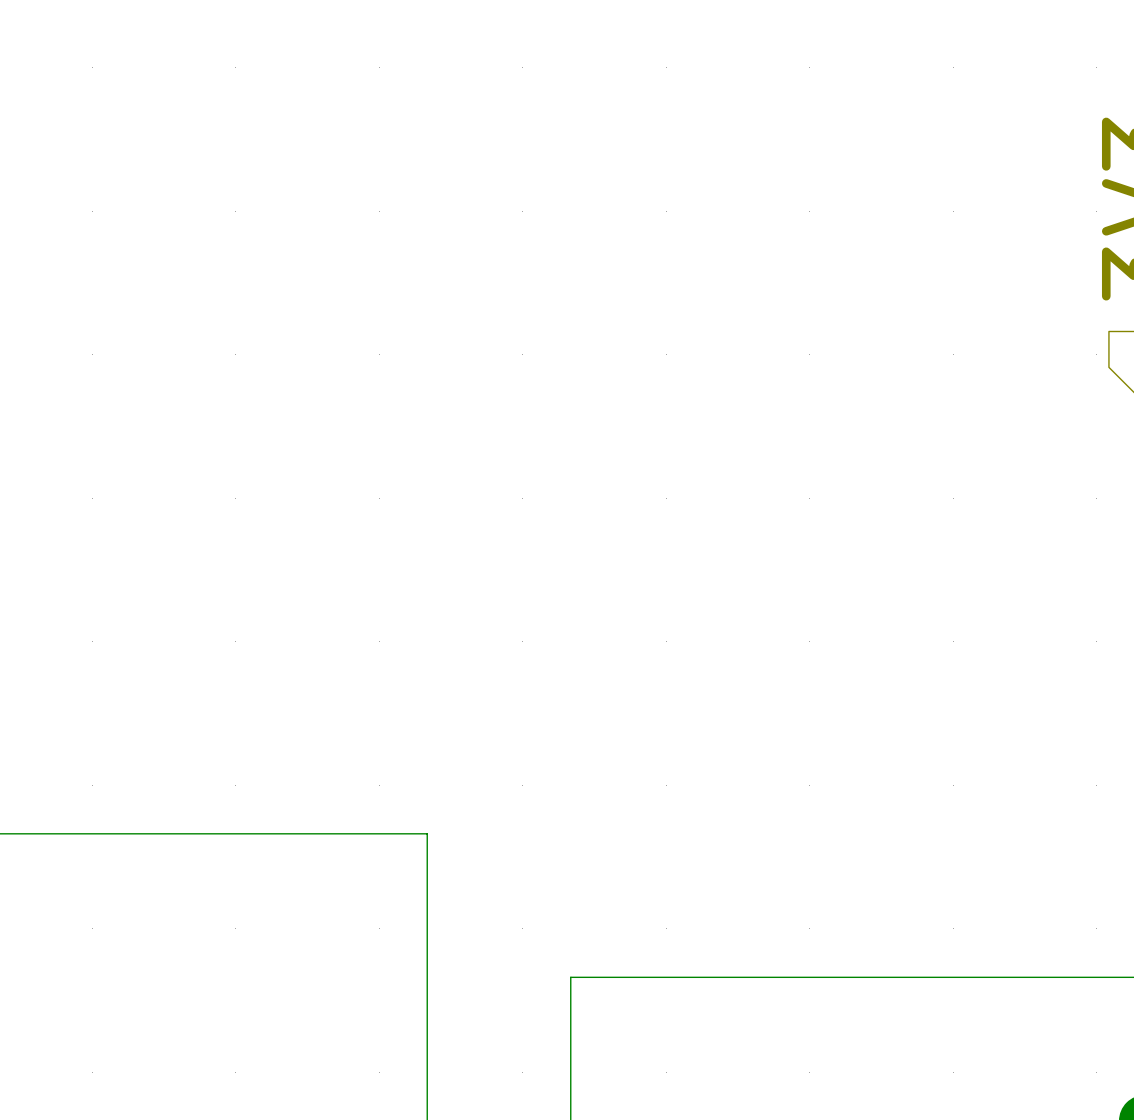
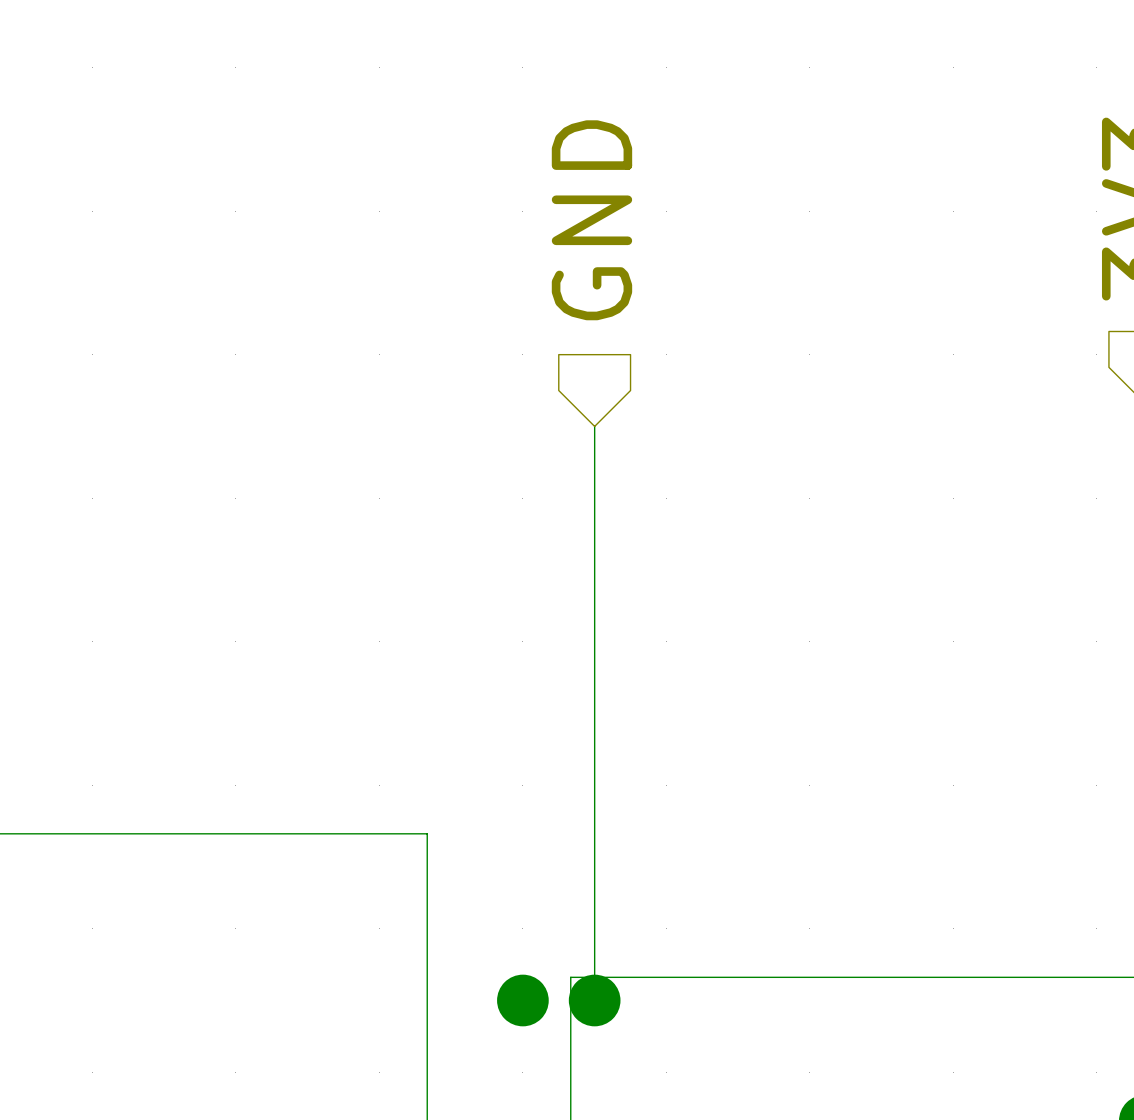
hierarchical label: none -> GND (591, 220)
wire: none -> (594, 426) (594, 1000)
junction: none -> (522, 1000)
junction: none -> (594, 1000)

